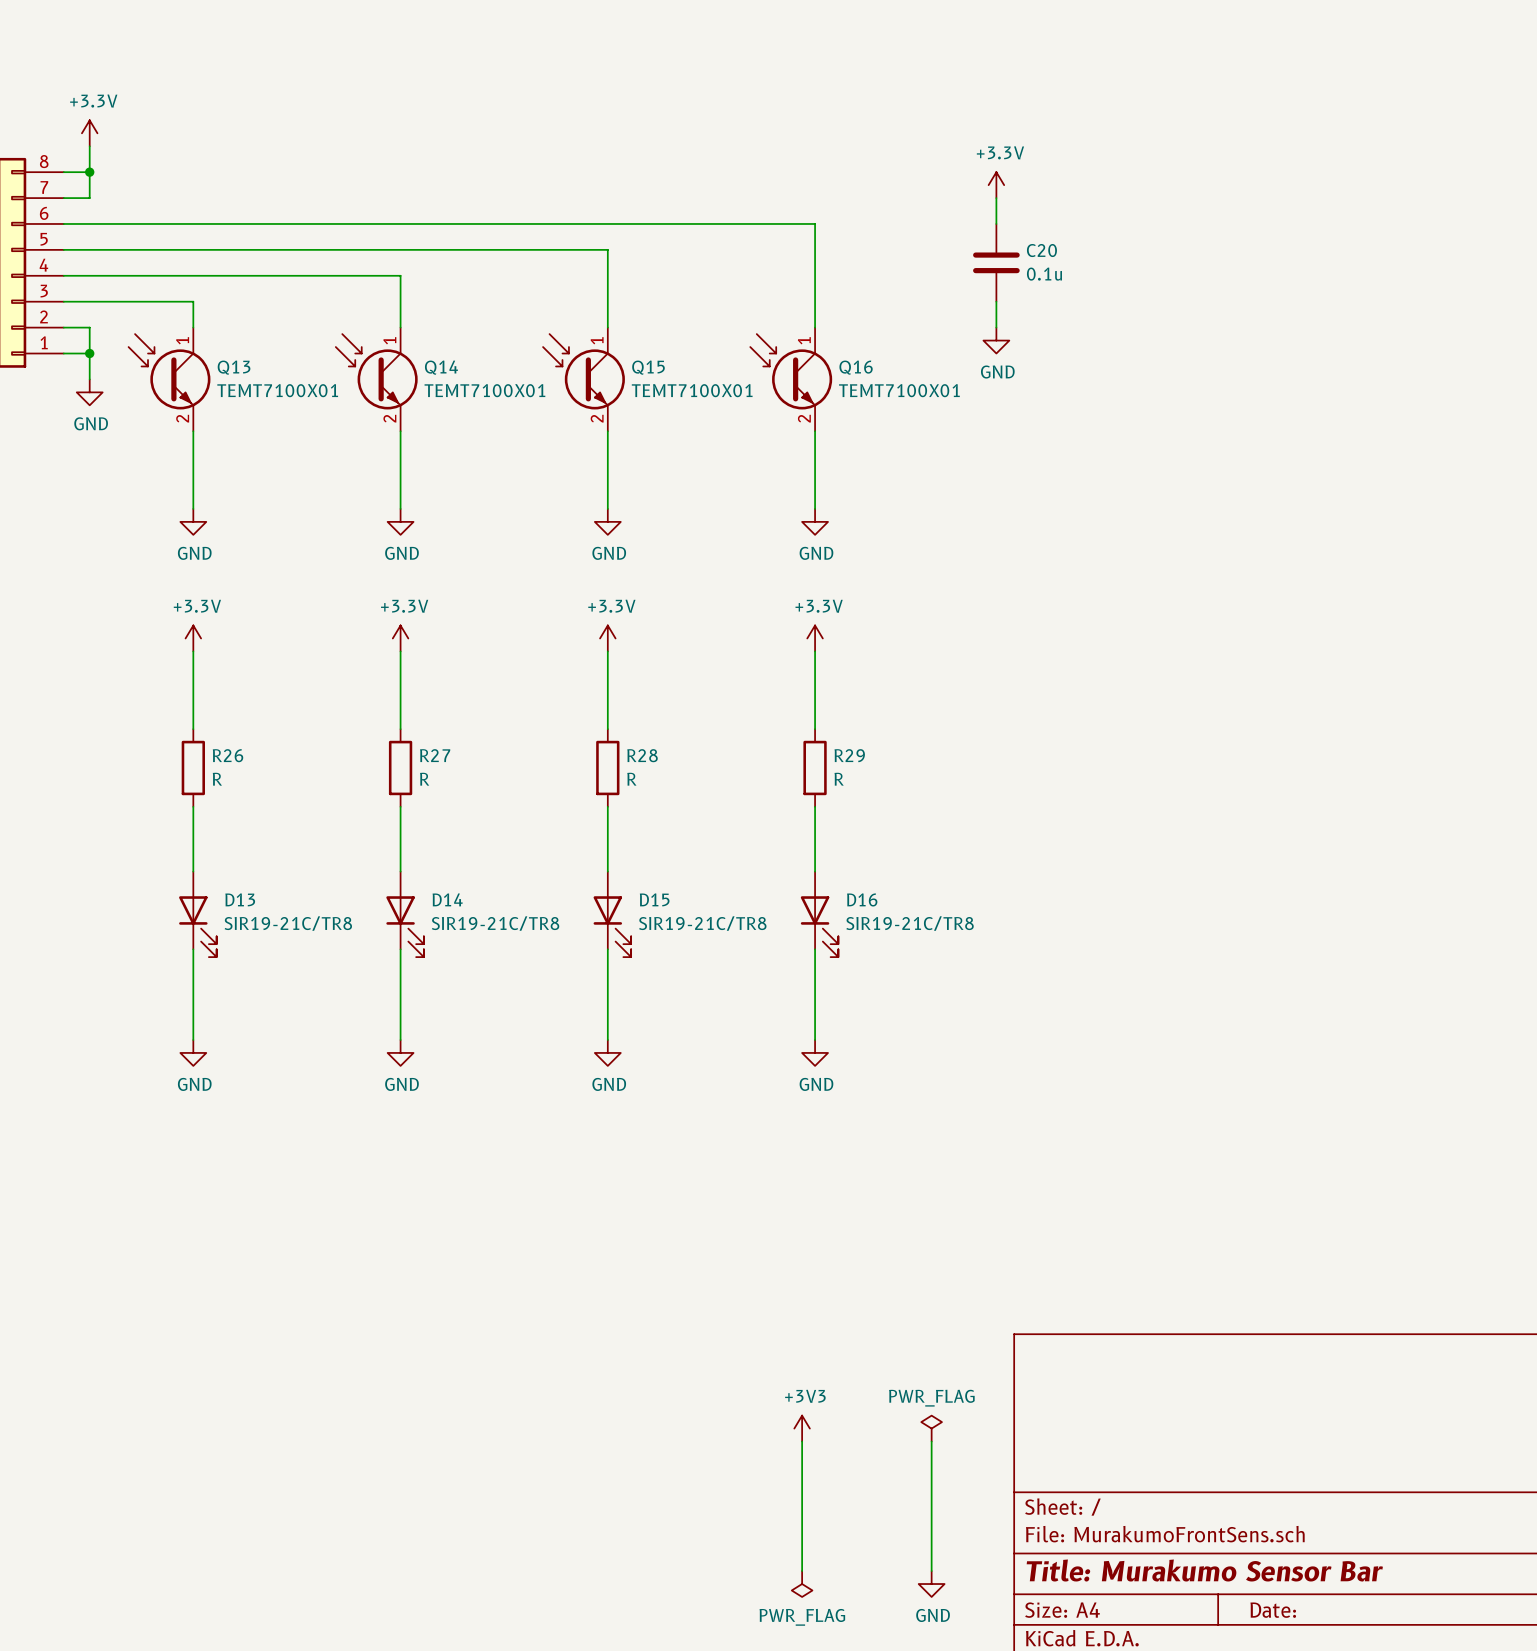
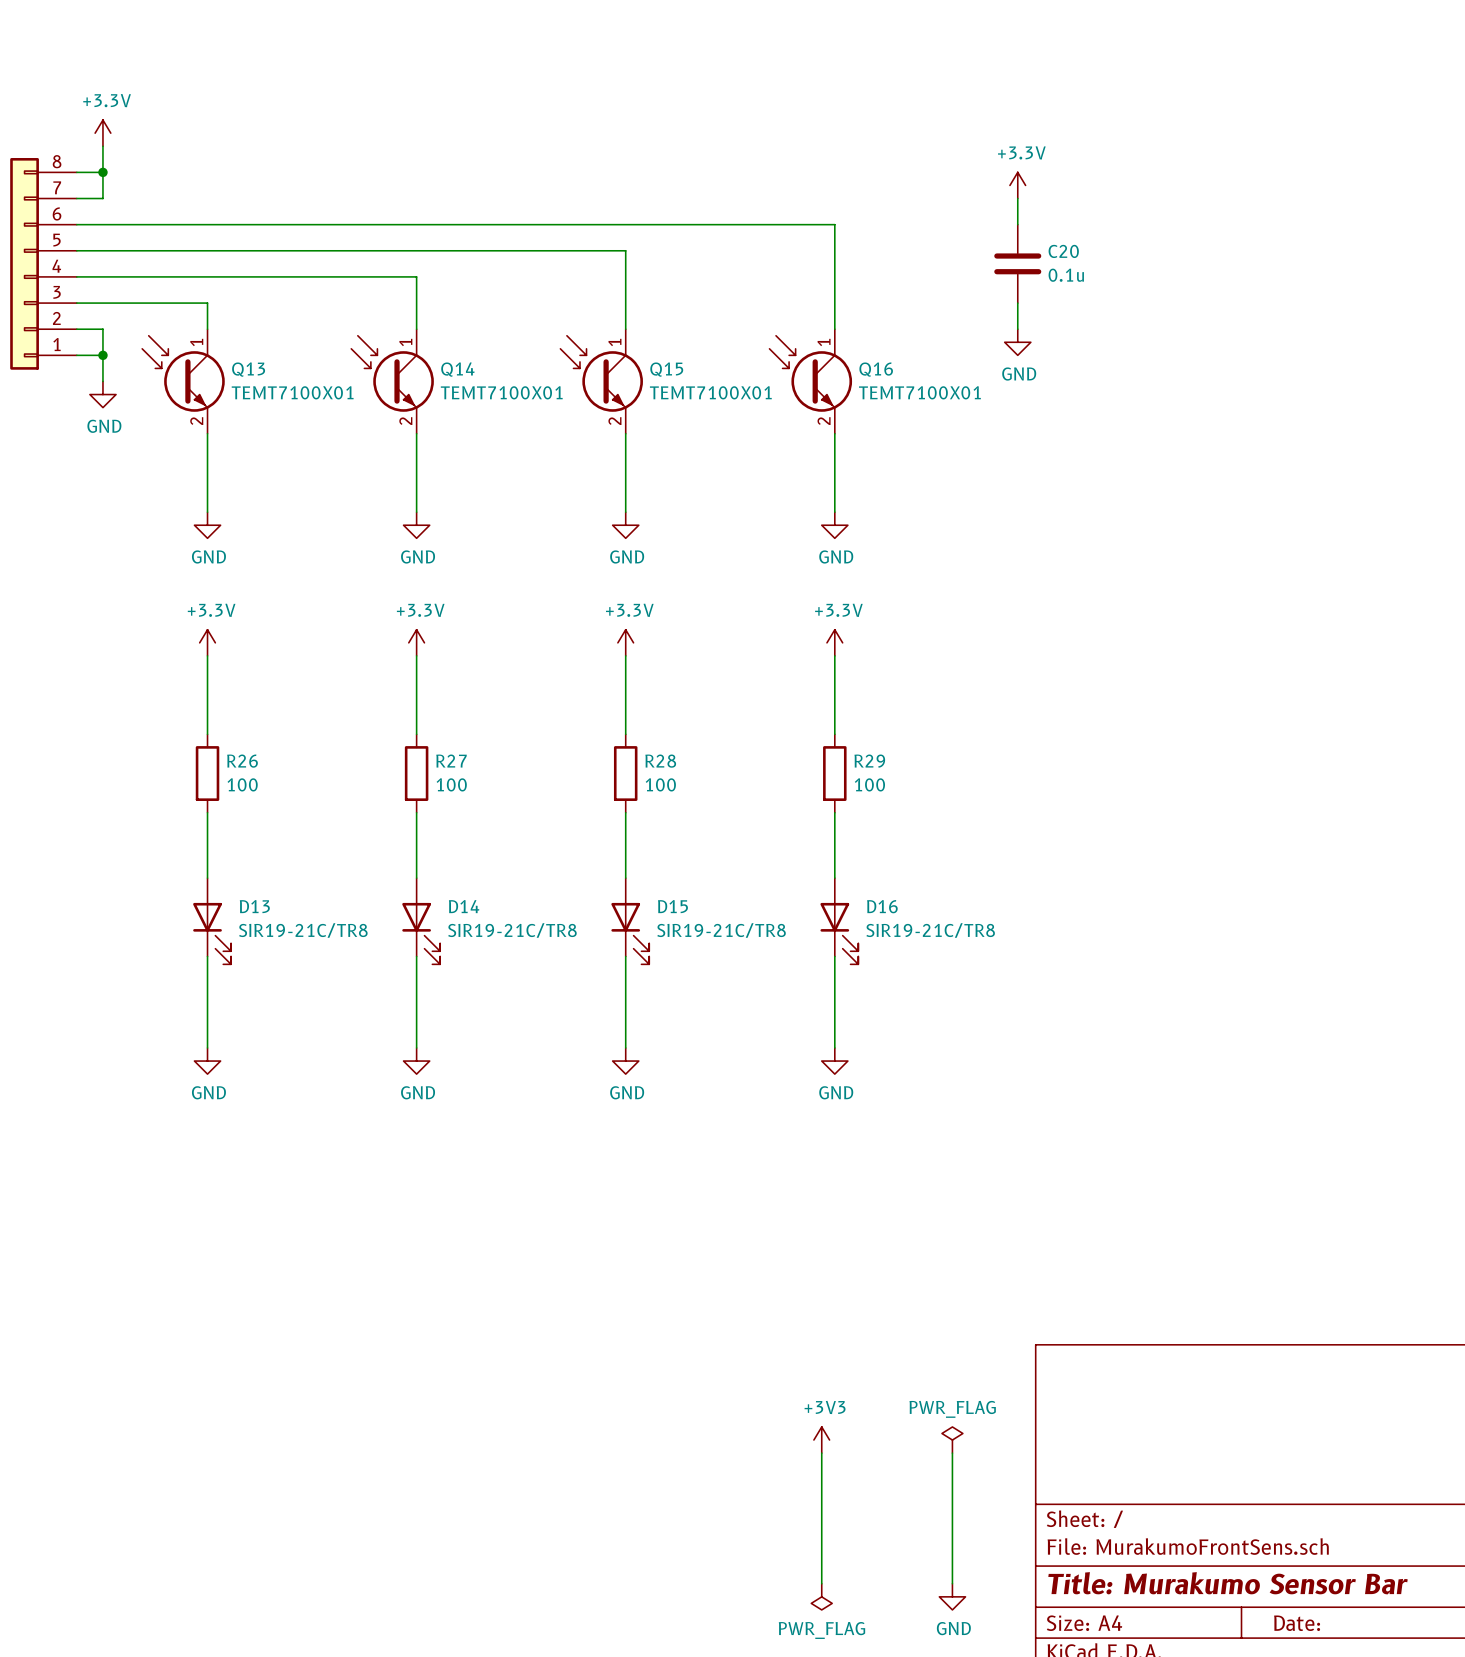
R26 value: R (217, 779) -> 100 (242, 784)
R27 value: R (424, 779) -> 100 (451, 784)
R28 value: R (631, 779) -> 100 (660, 784)
R29 value: R (839, 779) -> 100 (869, 784)

